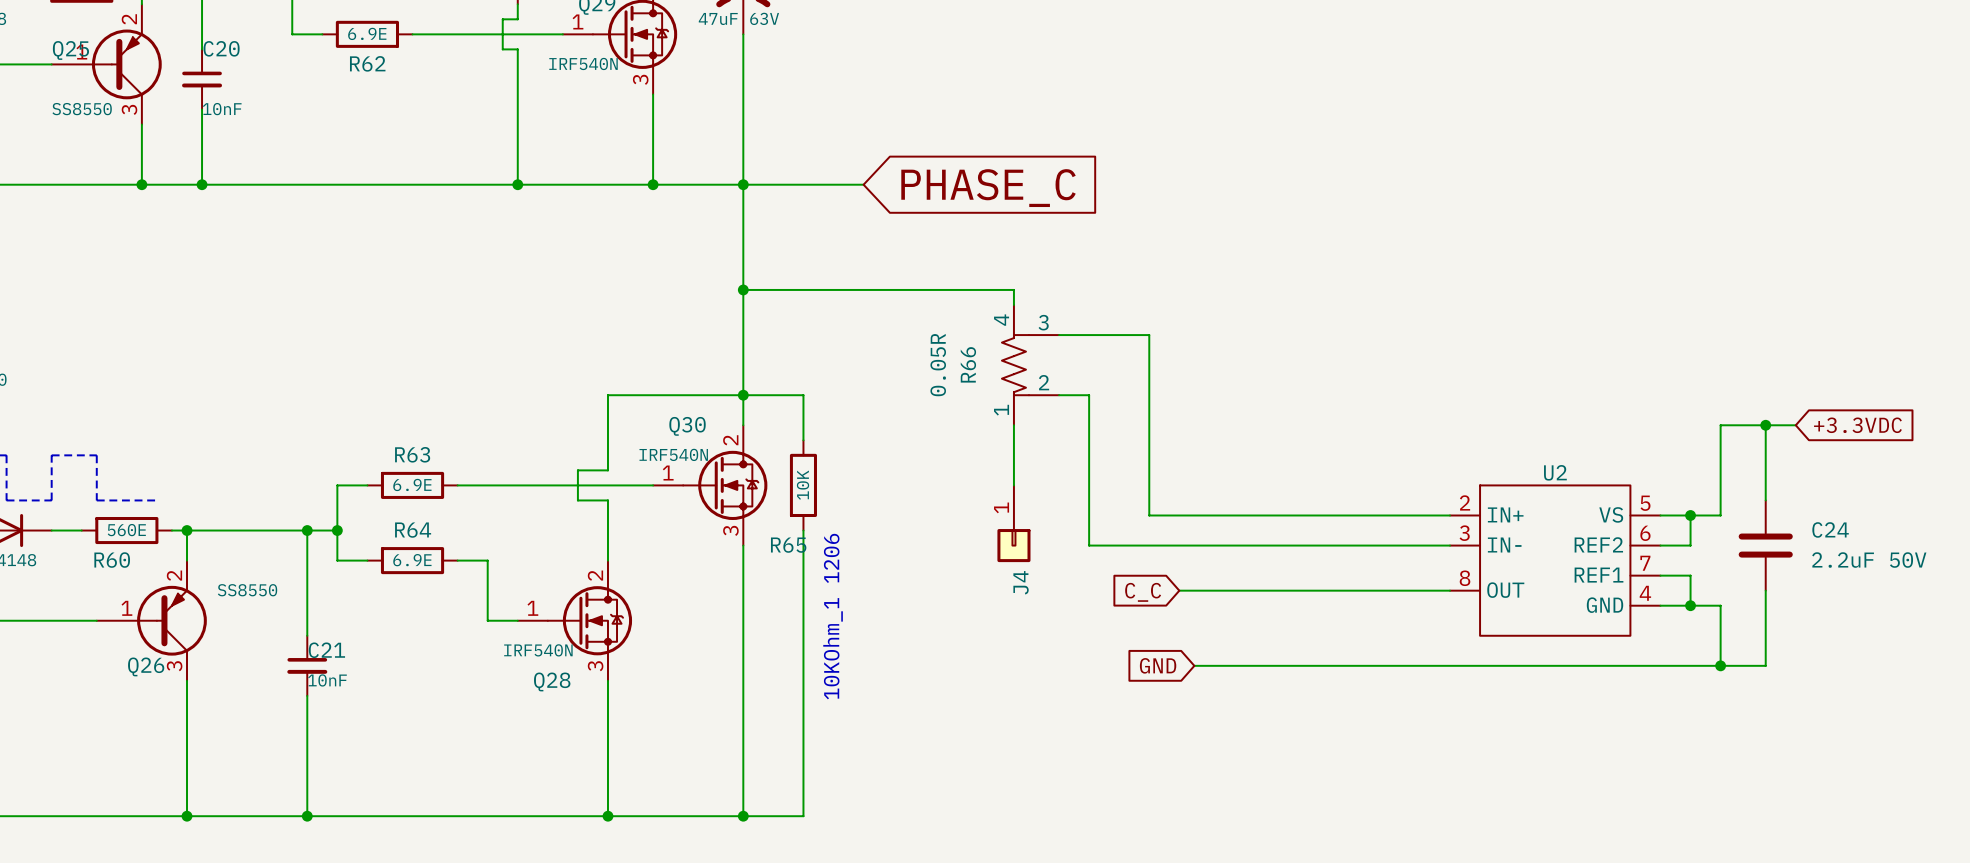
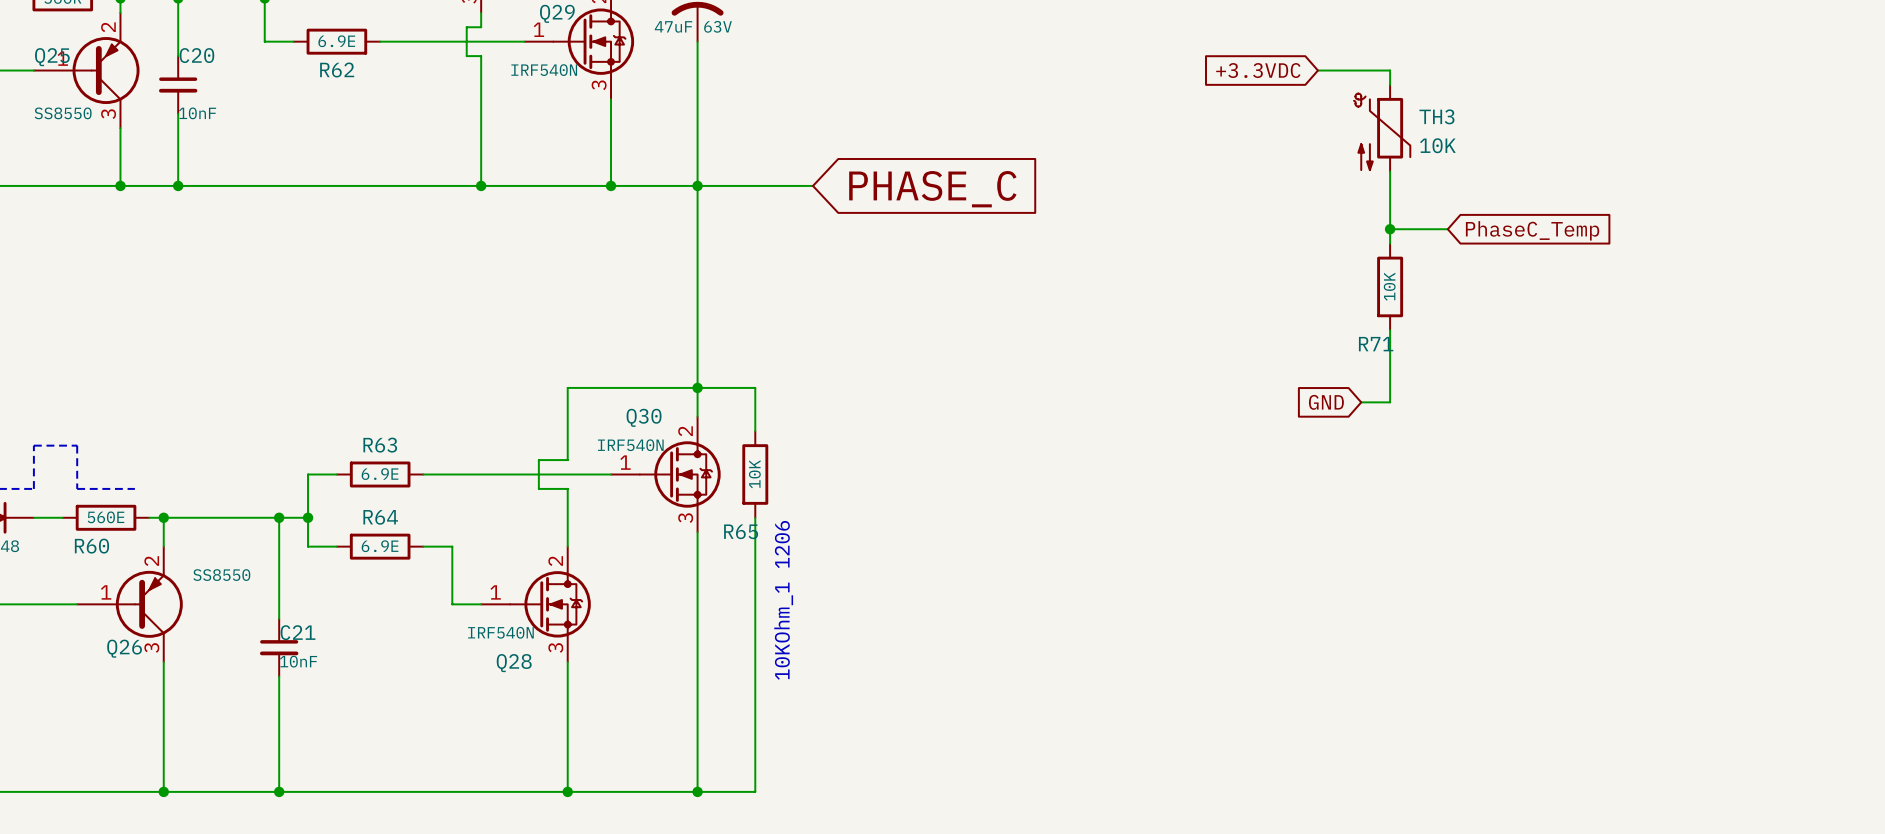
global label: none -> +3.3VDC (1258, 70)
wire: none -> (1317, 70) (1390, 70) (1390, 84)
TH3: none -> 10K (1382, 128)
wire: none -> (1390, 171) (1390, 243)
wire: none -> (1390, 229) (1447, 229)
junction: none -> (1390, 229)
global label: none -> PhaseC_Temp (1532, 230)
wire: (743, 289) (1013, 289) (1013, 304) -> none
junction: (743, 289) -> none
R71: none -> 10K (1390, 286)
wire: (1059, 335) (1149, 335) (1149, 515) (1449, 515) -> none
wire: none -> (1390, 330) (1390, 402) (1361, 402)
R66: 0.05R (1030, 365) -> none
wire: (1059, 395) (1089, 395) (1089, 545) (1449, 545) -> none
global label: none -> GND (1326, 402)
wire: (1013, 425) (1013, 485) -> none
wire: (1765, 425) (1765, 500) -> none
junction: (1765, 425) -> none
wire: (1795, 425) (1720, 425) (1720, 515) (1660, 515) -> none
global label: +3.3VDC (1857, 425) -> none
wire: (1690, 515) (1690, 545) (1660, 545) -> none
junction: (1690, 515) -> none
J4: (1013, 523) -> none
C24: 2.2uF 50V (1765, 545) -> none
U2: (1555, 560) -> none
wire: (1660, 575) (1690, 575) (1690, 605) -> none
wire: (1179, 590) (1449, 590) -> none
wire: (1765, 590) (1765, 665) (1194, 665) -> none
global label: C_C (1143, 592) -> none
wire: (1660, 605) (1720, 605) (1720, 665) -> none
junction: (1690, 605) -> none
global label: GND (1158, 665) -> none
junction: (1720, 665) -> none

